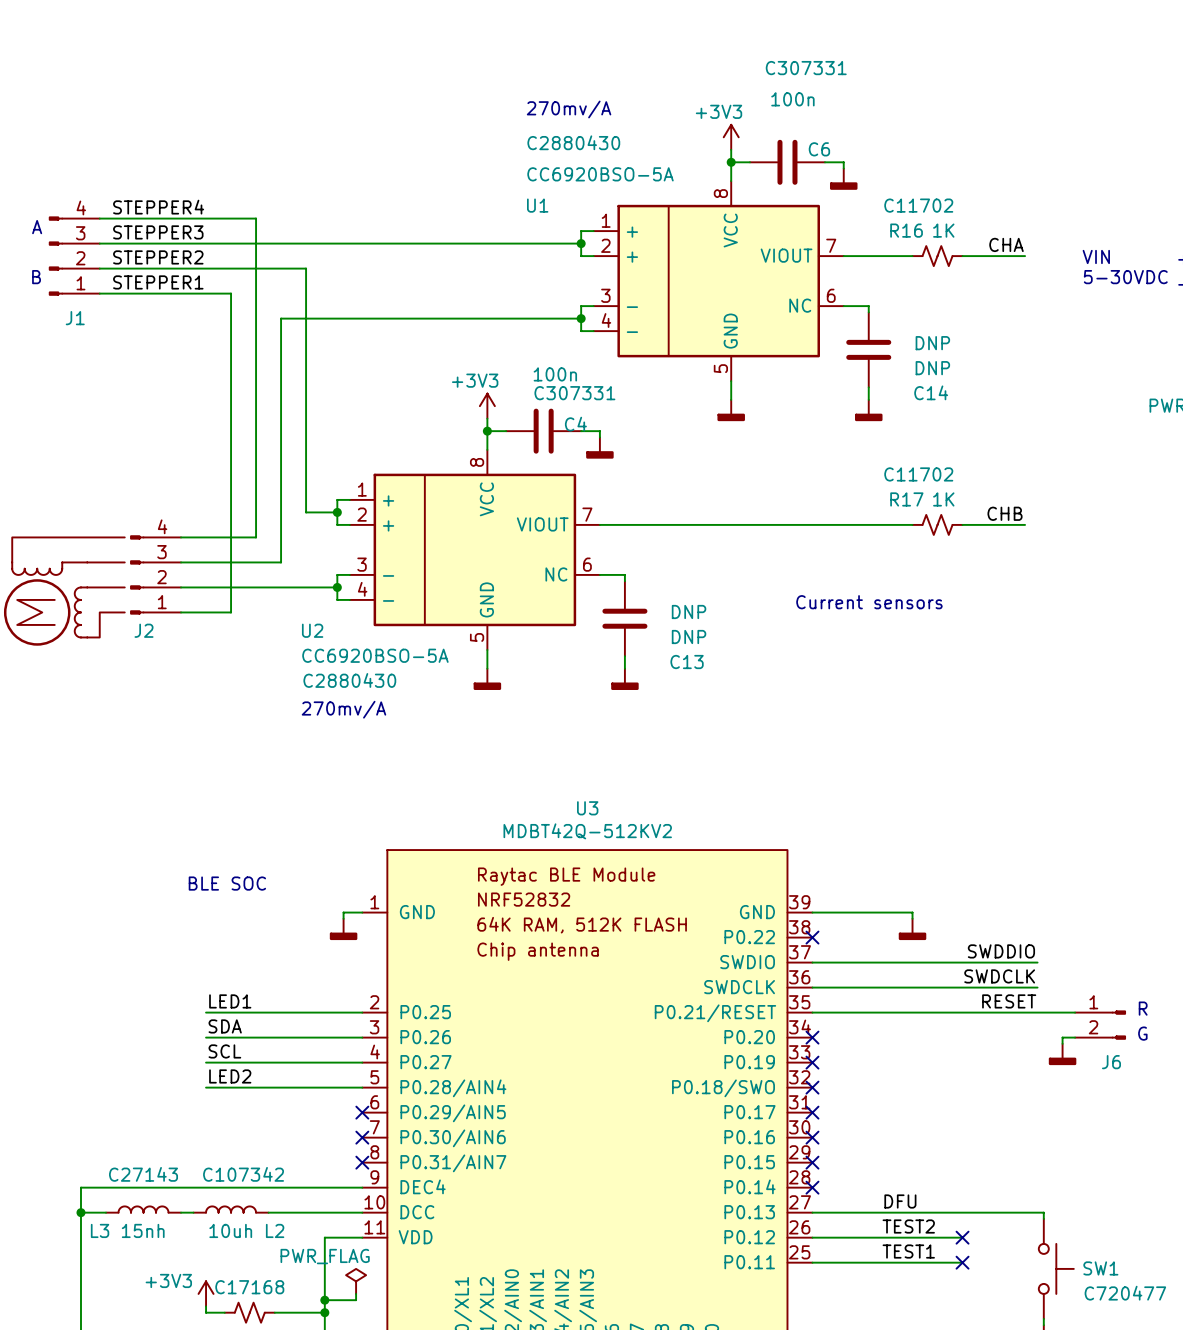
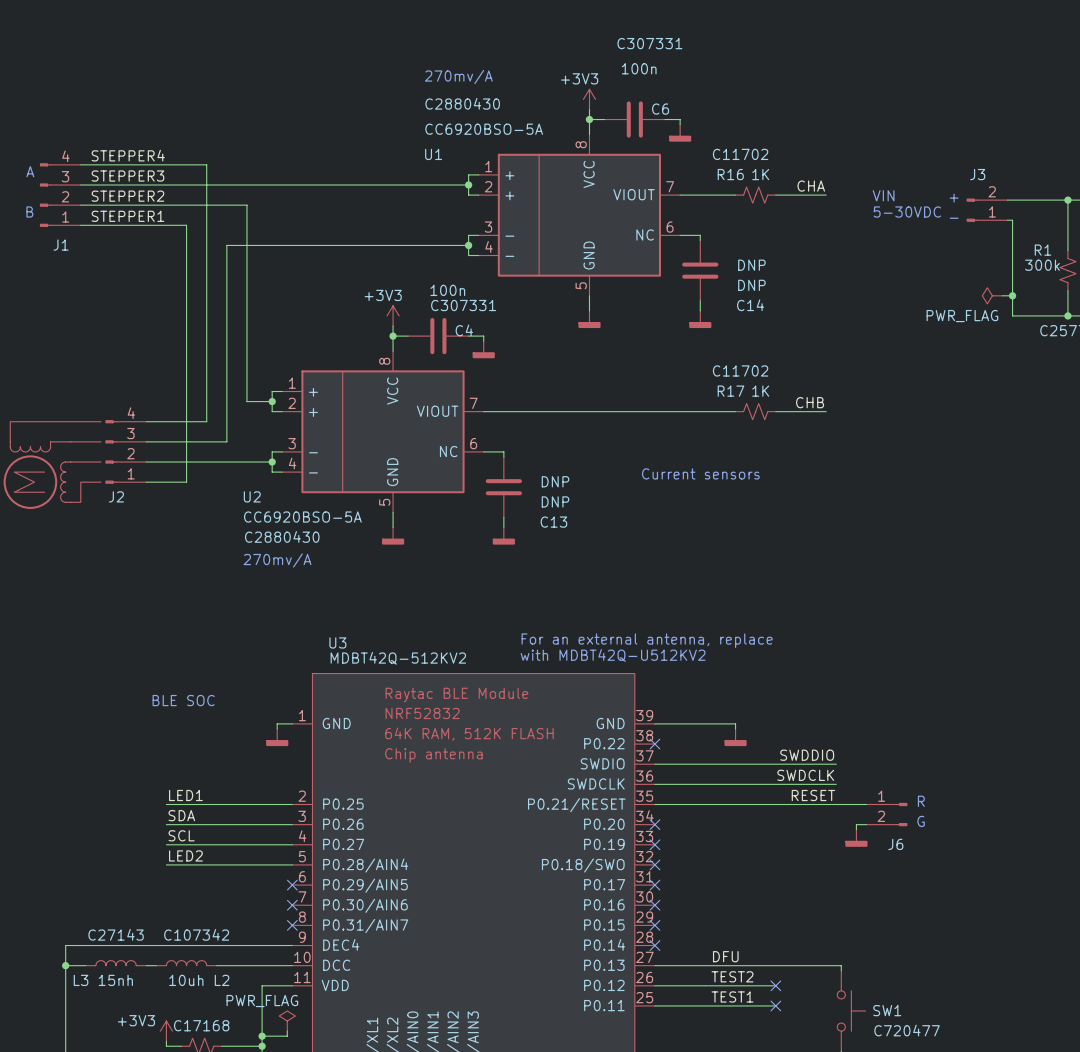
U3 name position: U3 (587, 808) -> U3 (337, 642)
text: none -> For an external antenna, replace (647, 640)
text: none -> with MDBT42Q-U512KV2 (613, 655)
U3 value position: MDBT42Q-512KV2 (587, 831) -> MDBT42Q-512KV2 (398, 658)

